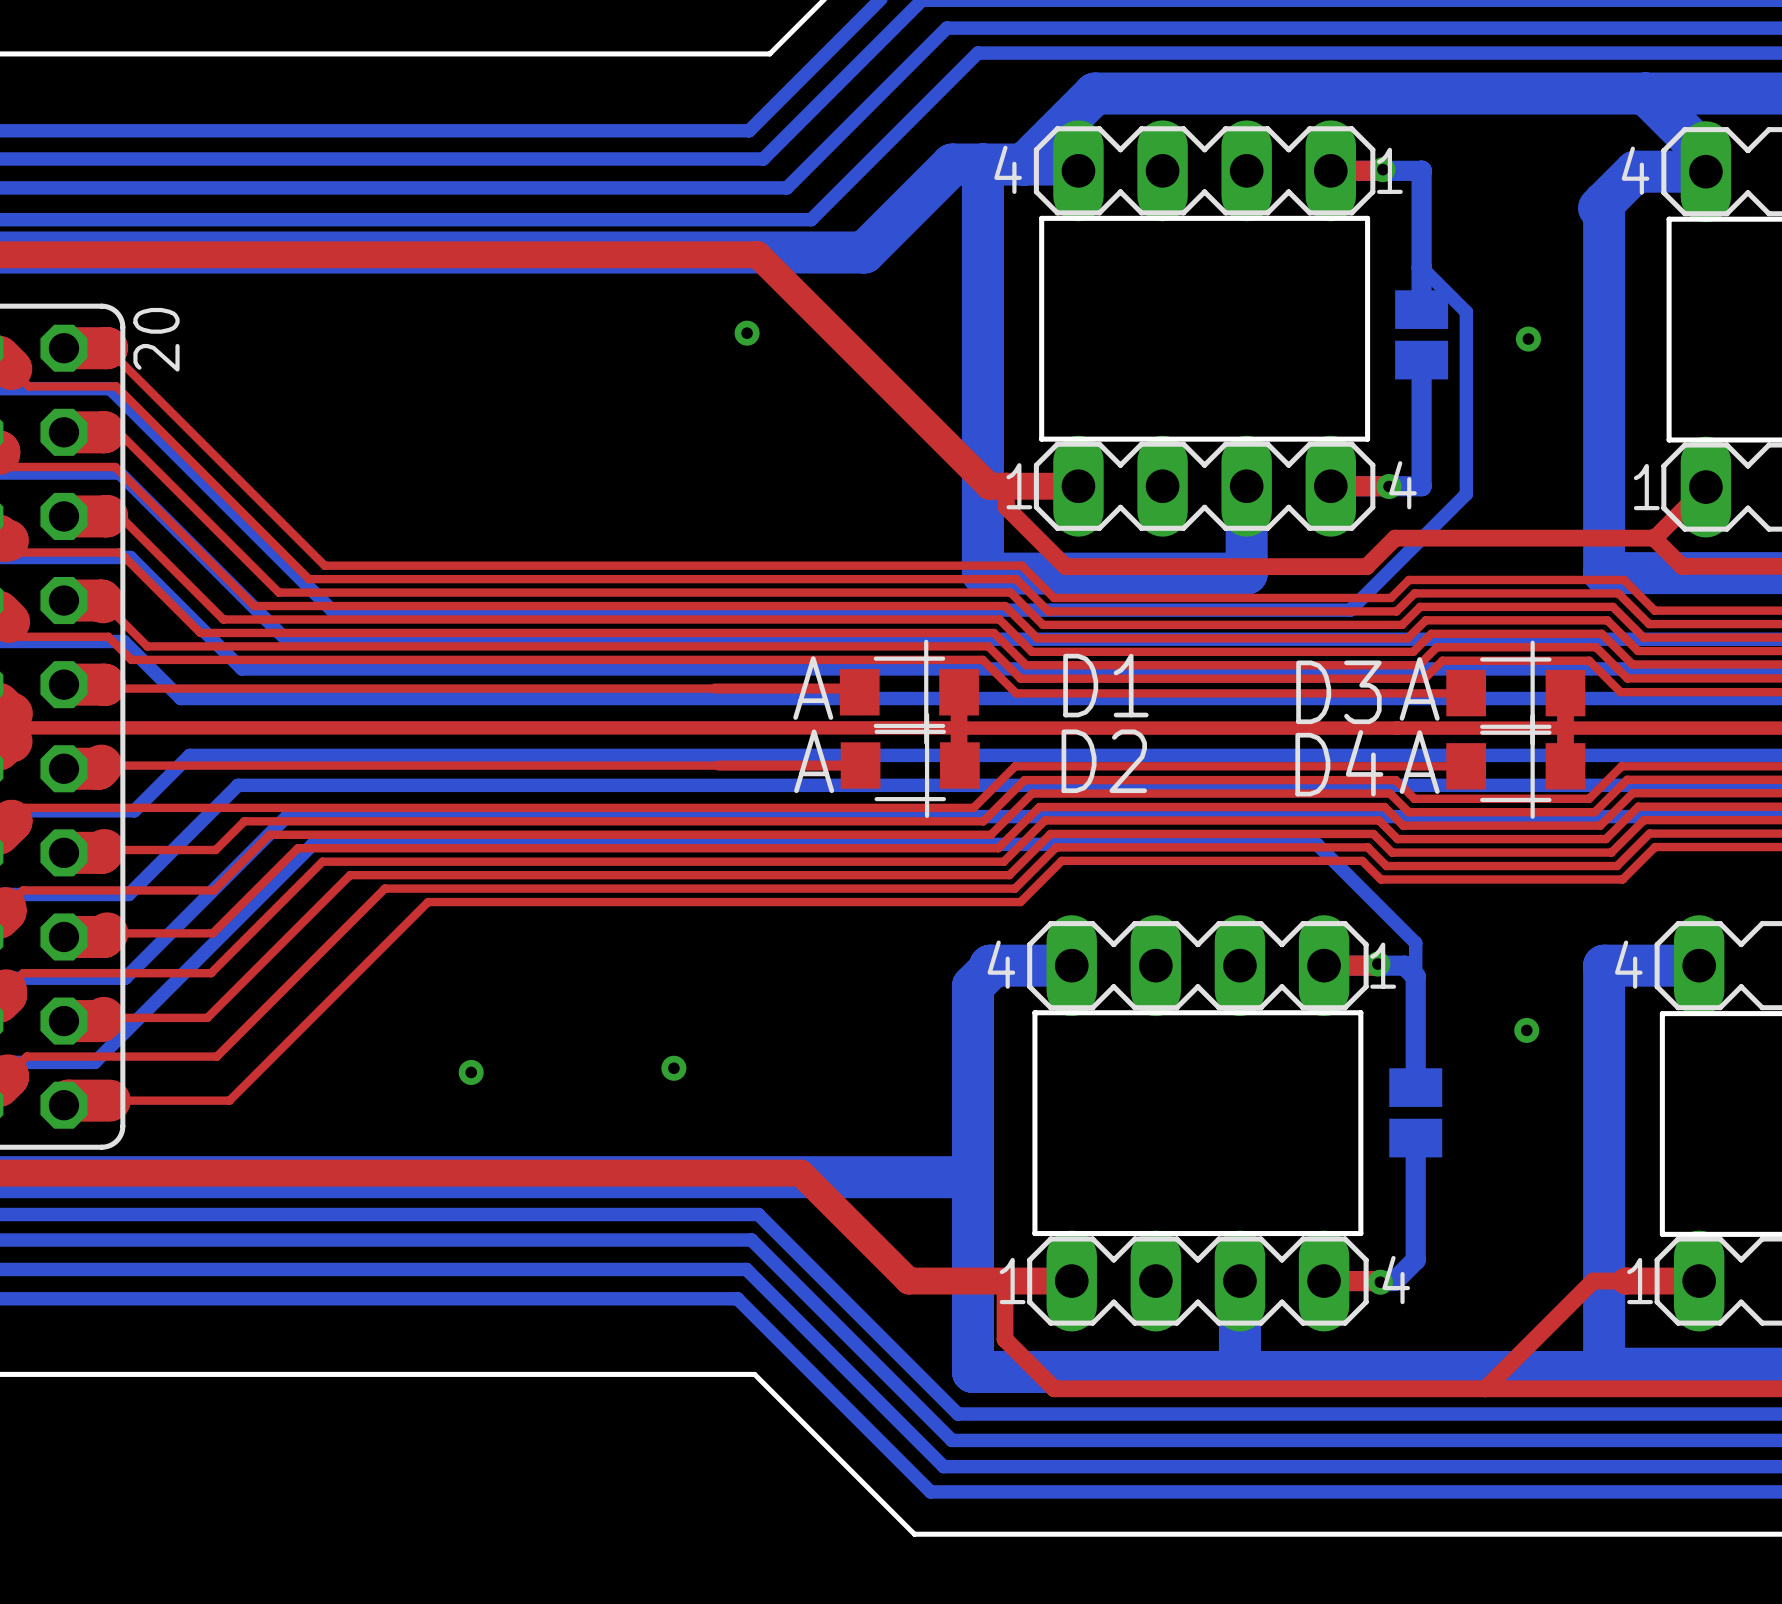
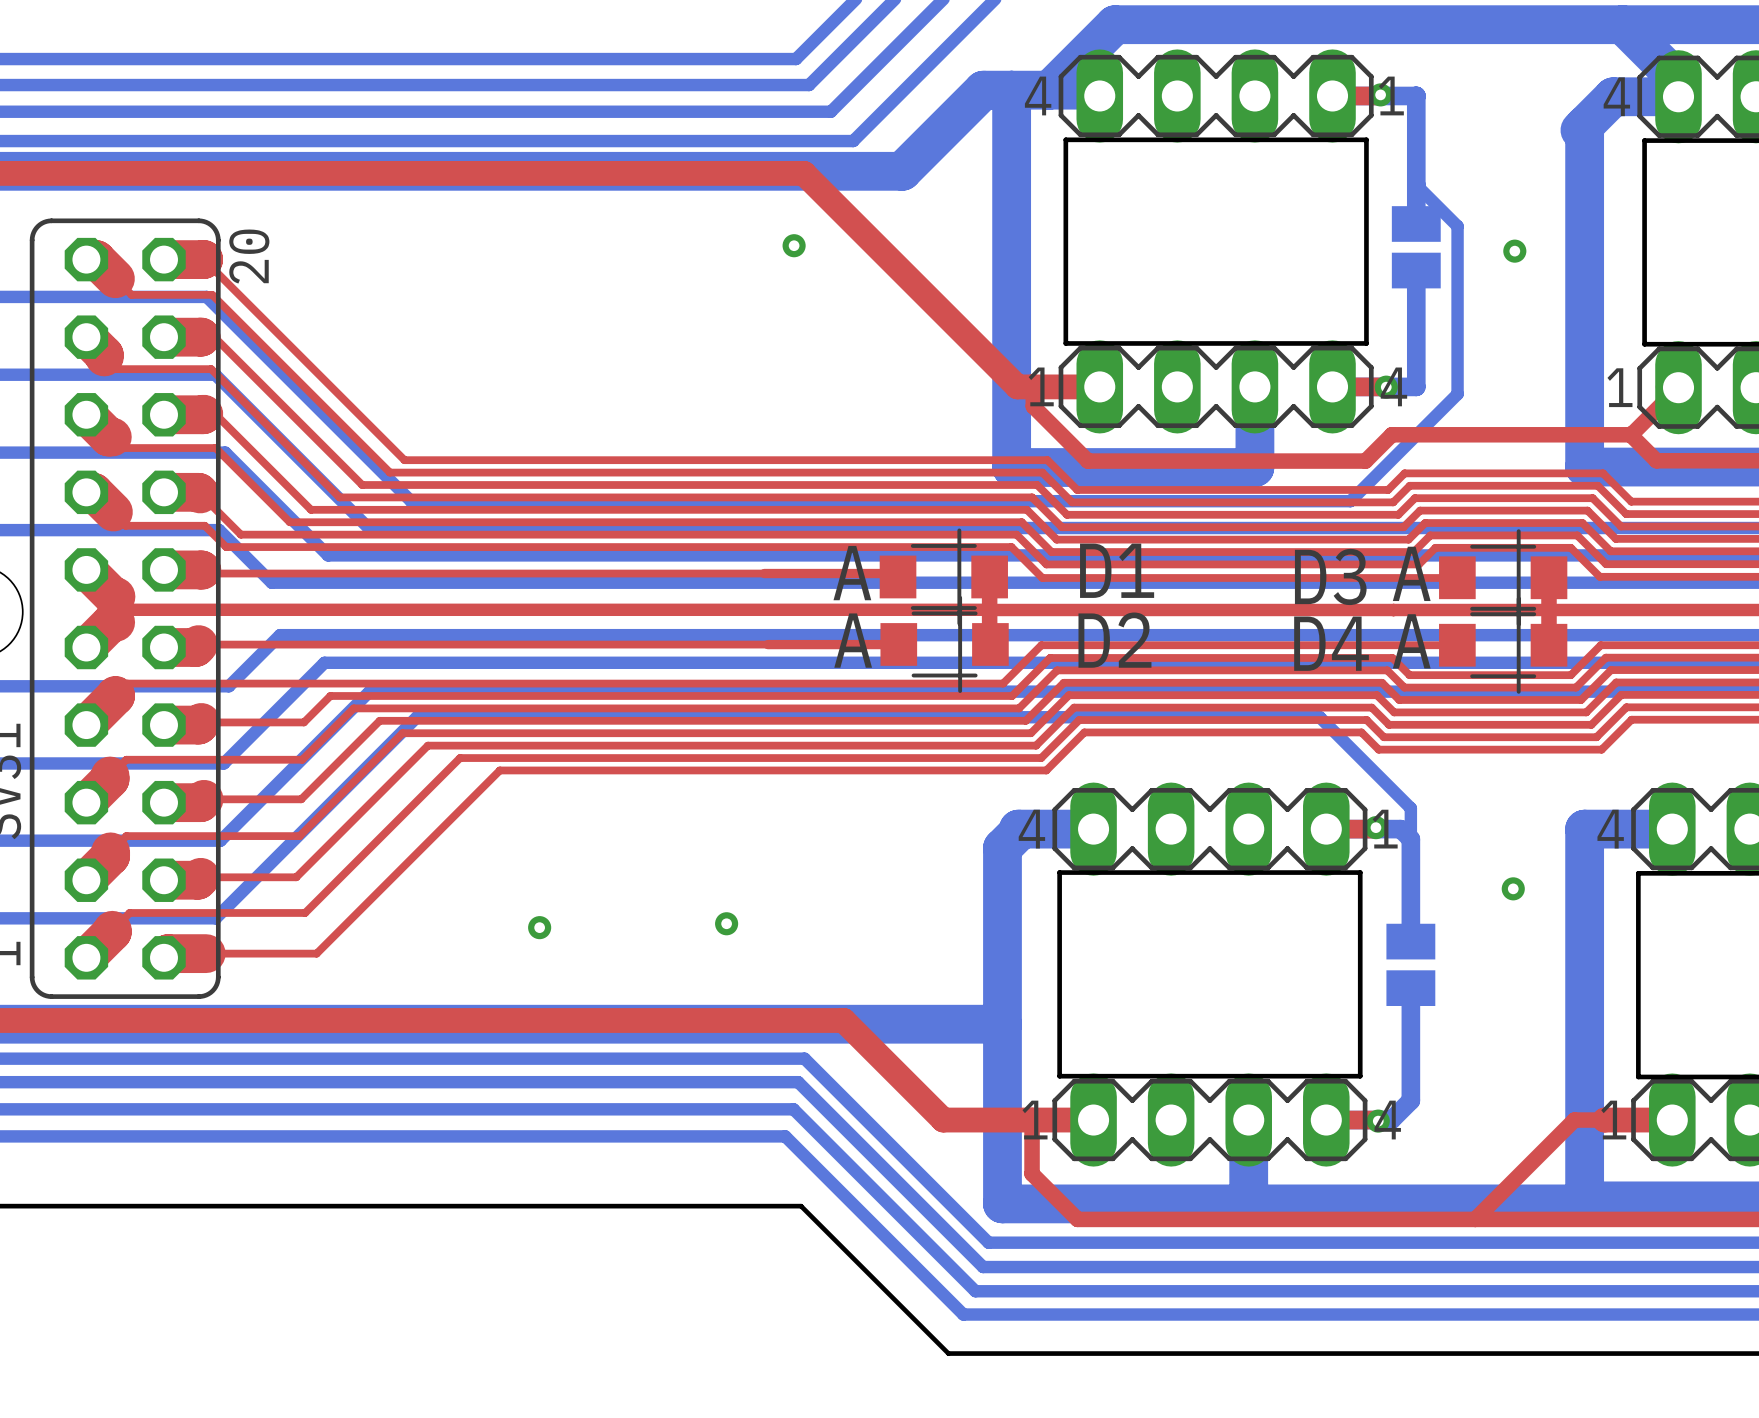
bottom track: (338, 844) (312, 844) (94, 1062) -> (416, 717) (215, 918) (192, 918)

